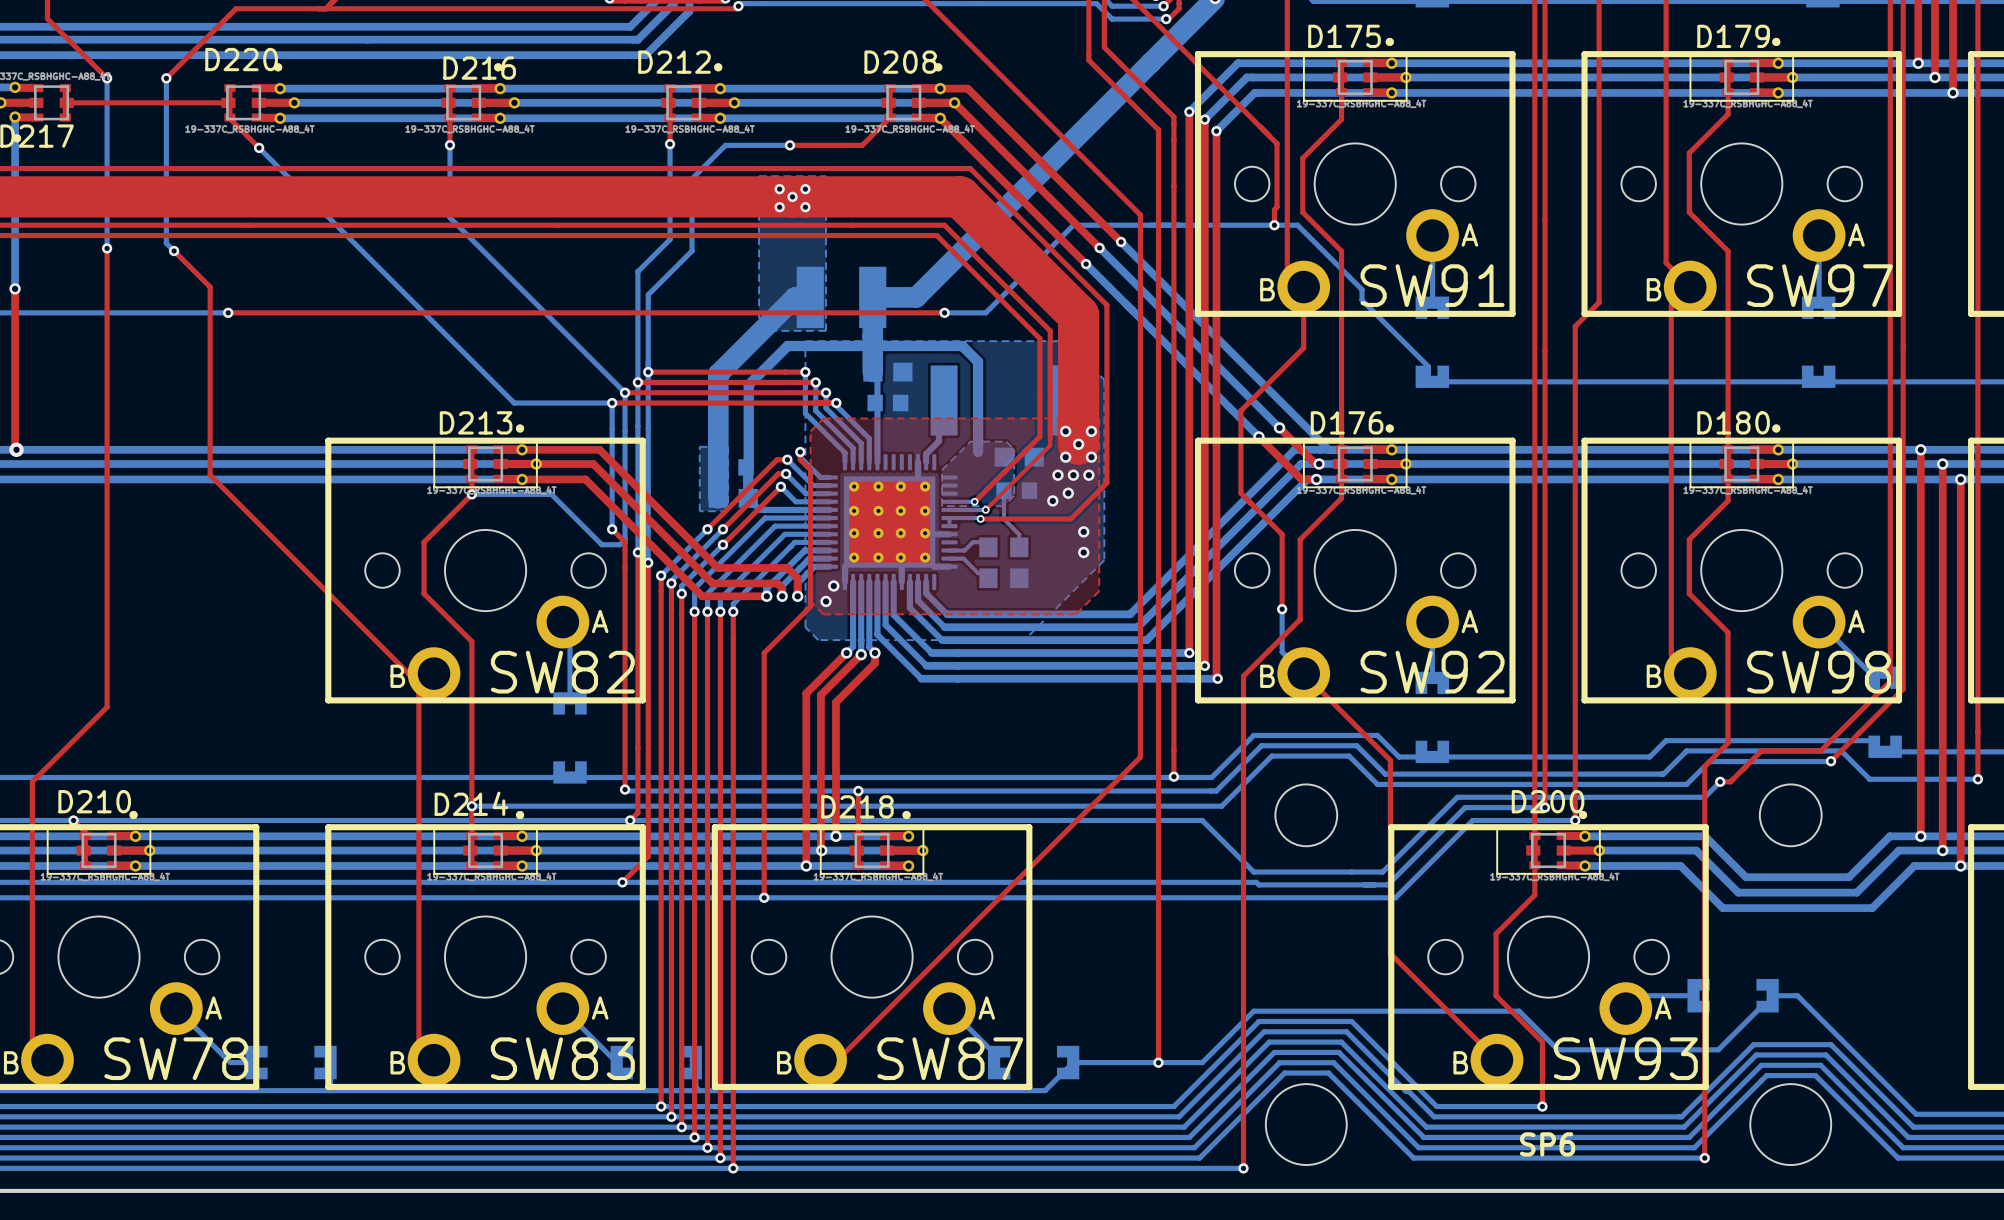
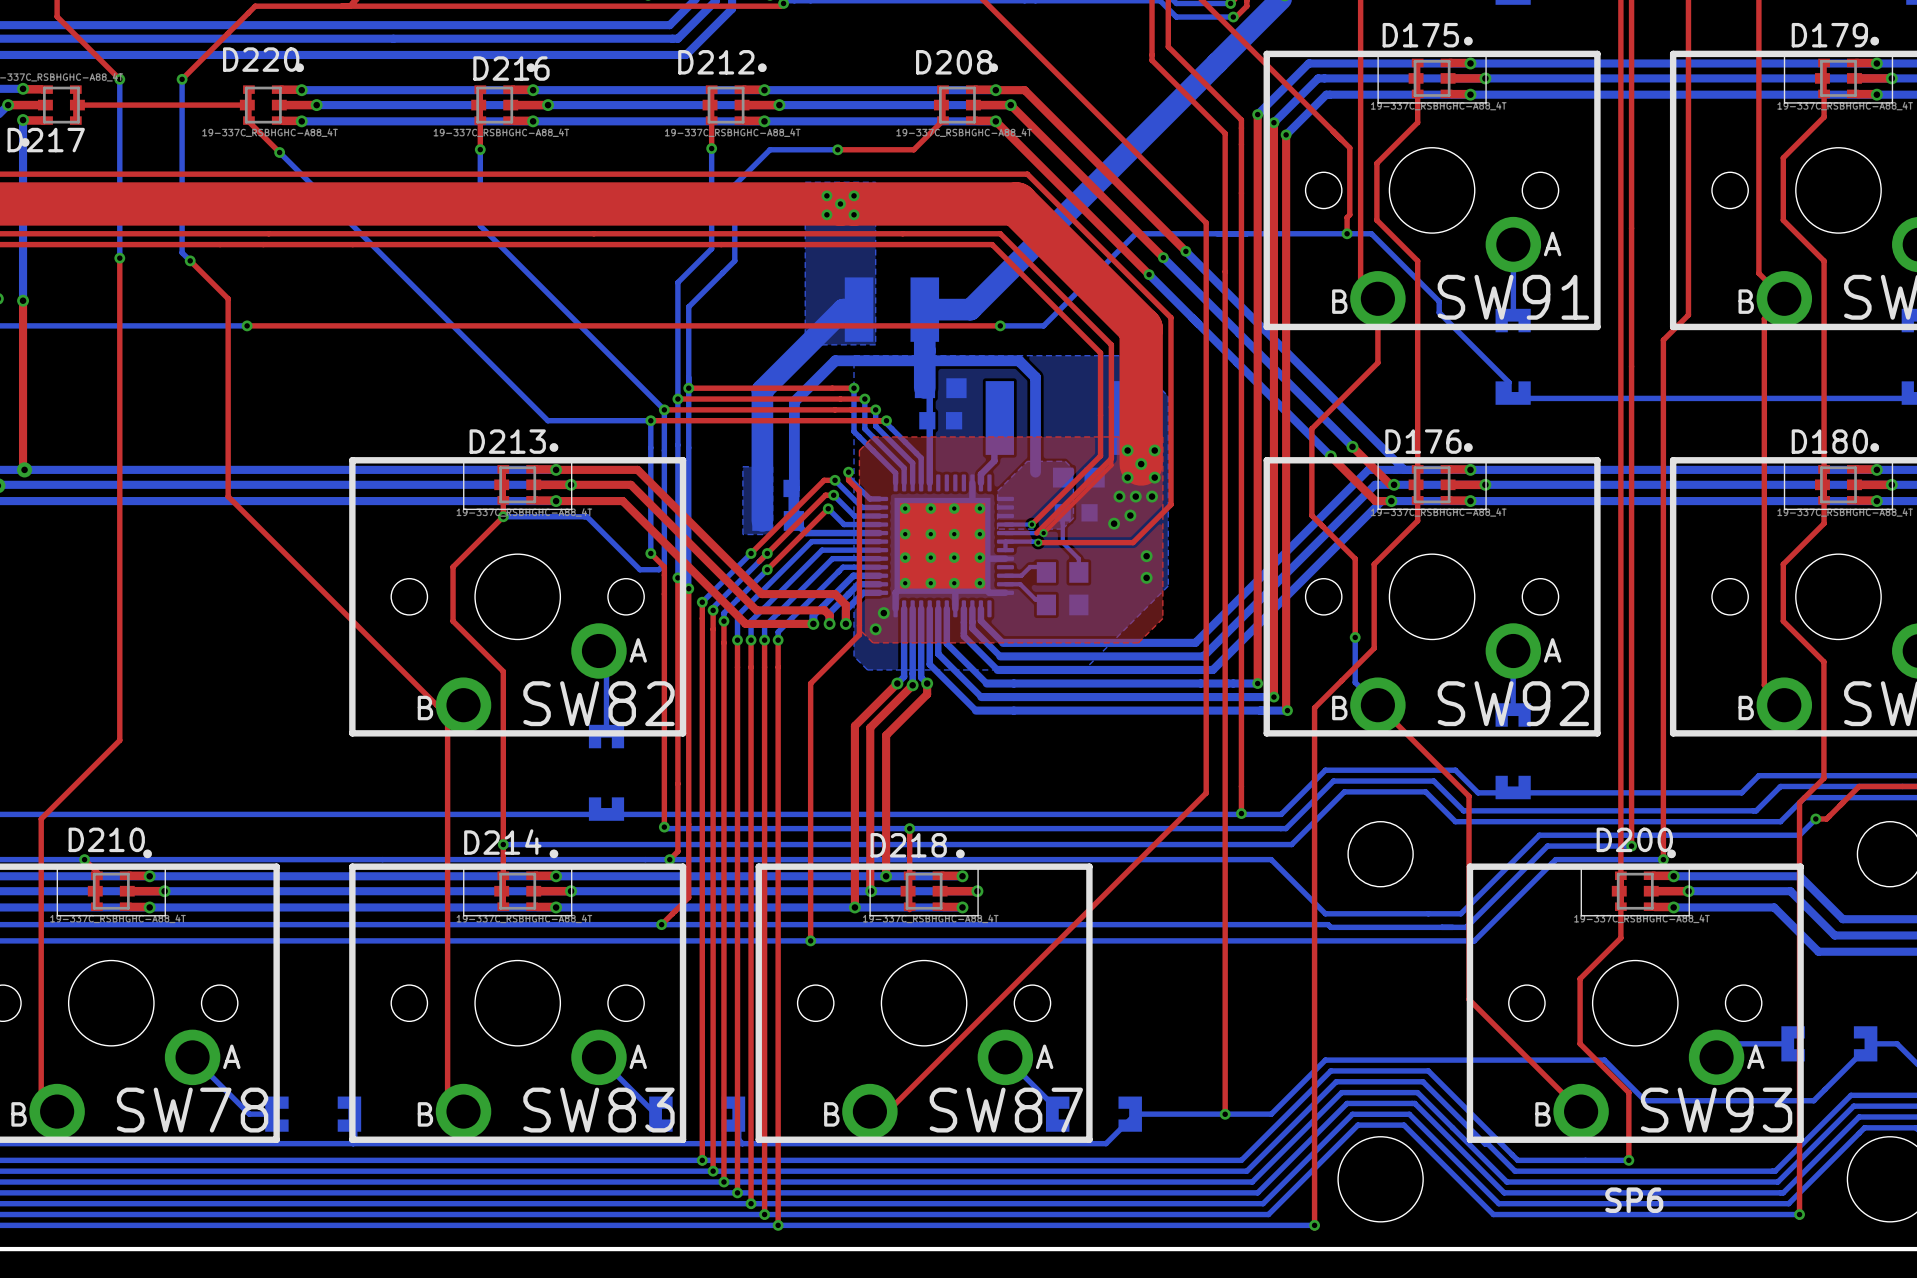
top track: none -> (1111, 458) (1036, 533)
top track: none -> (767, 553) (759, 561)

